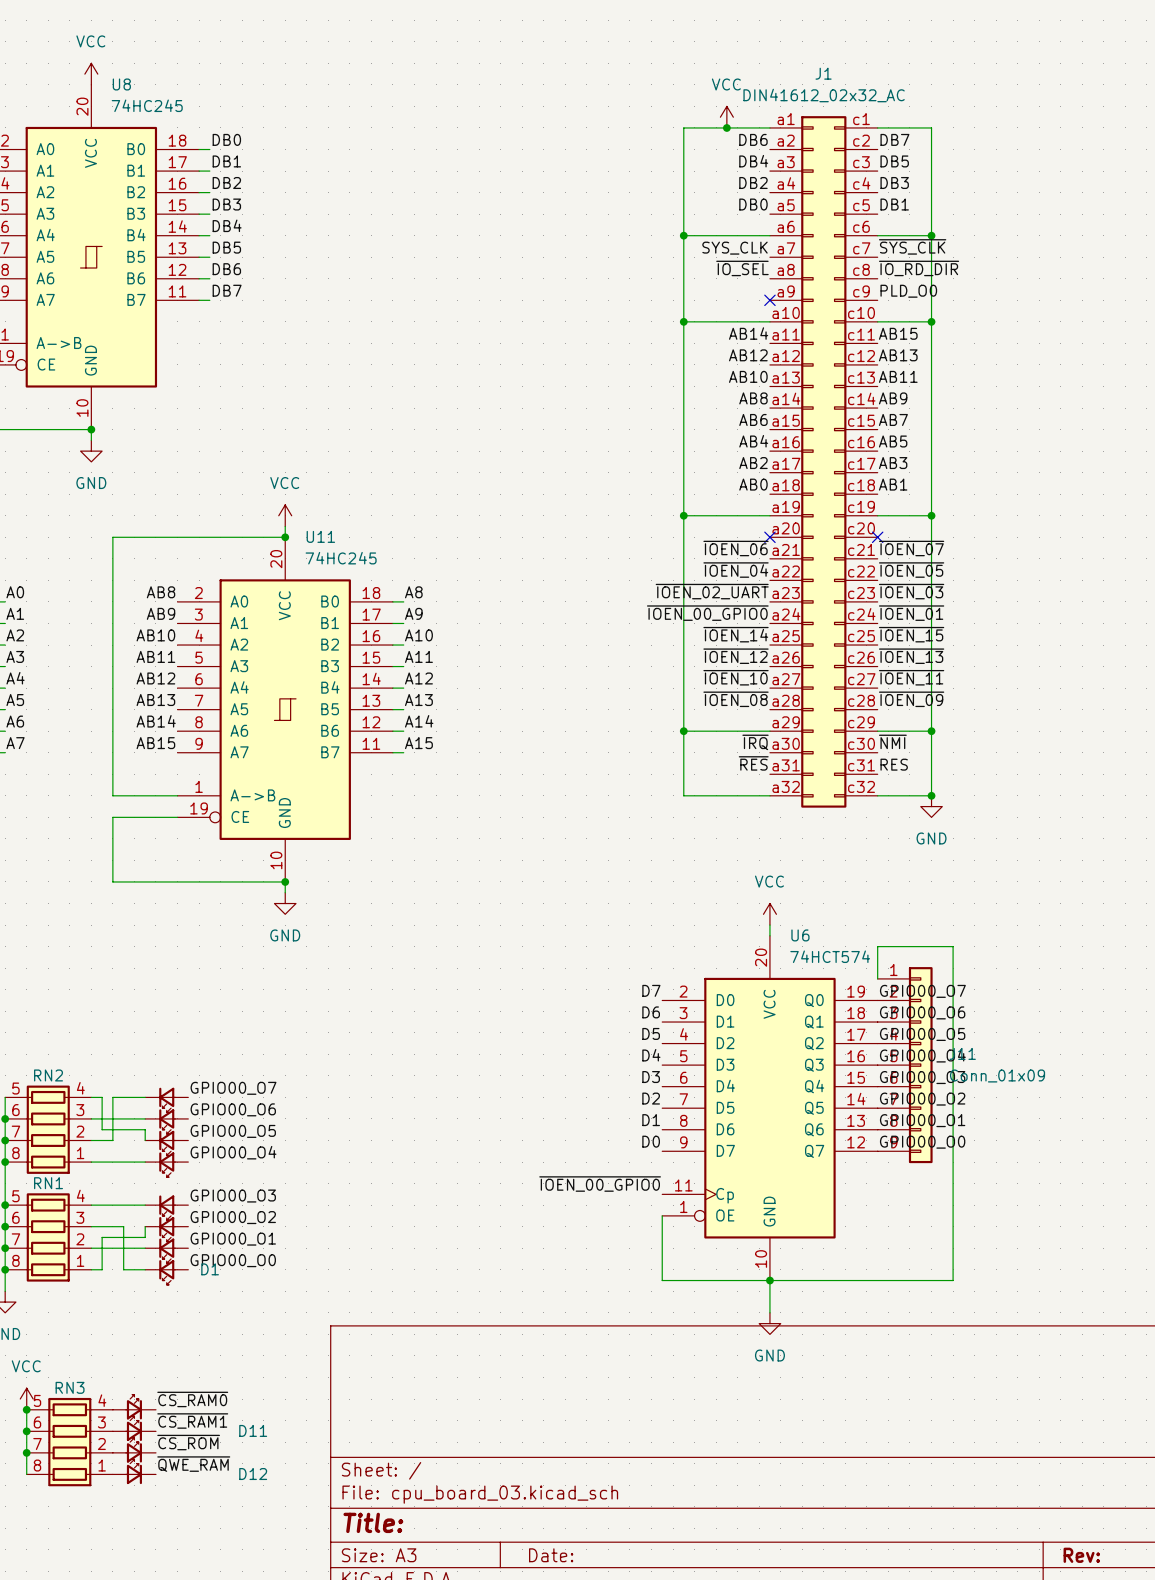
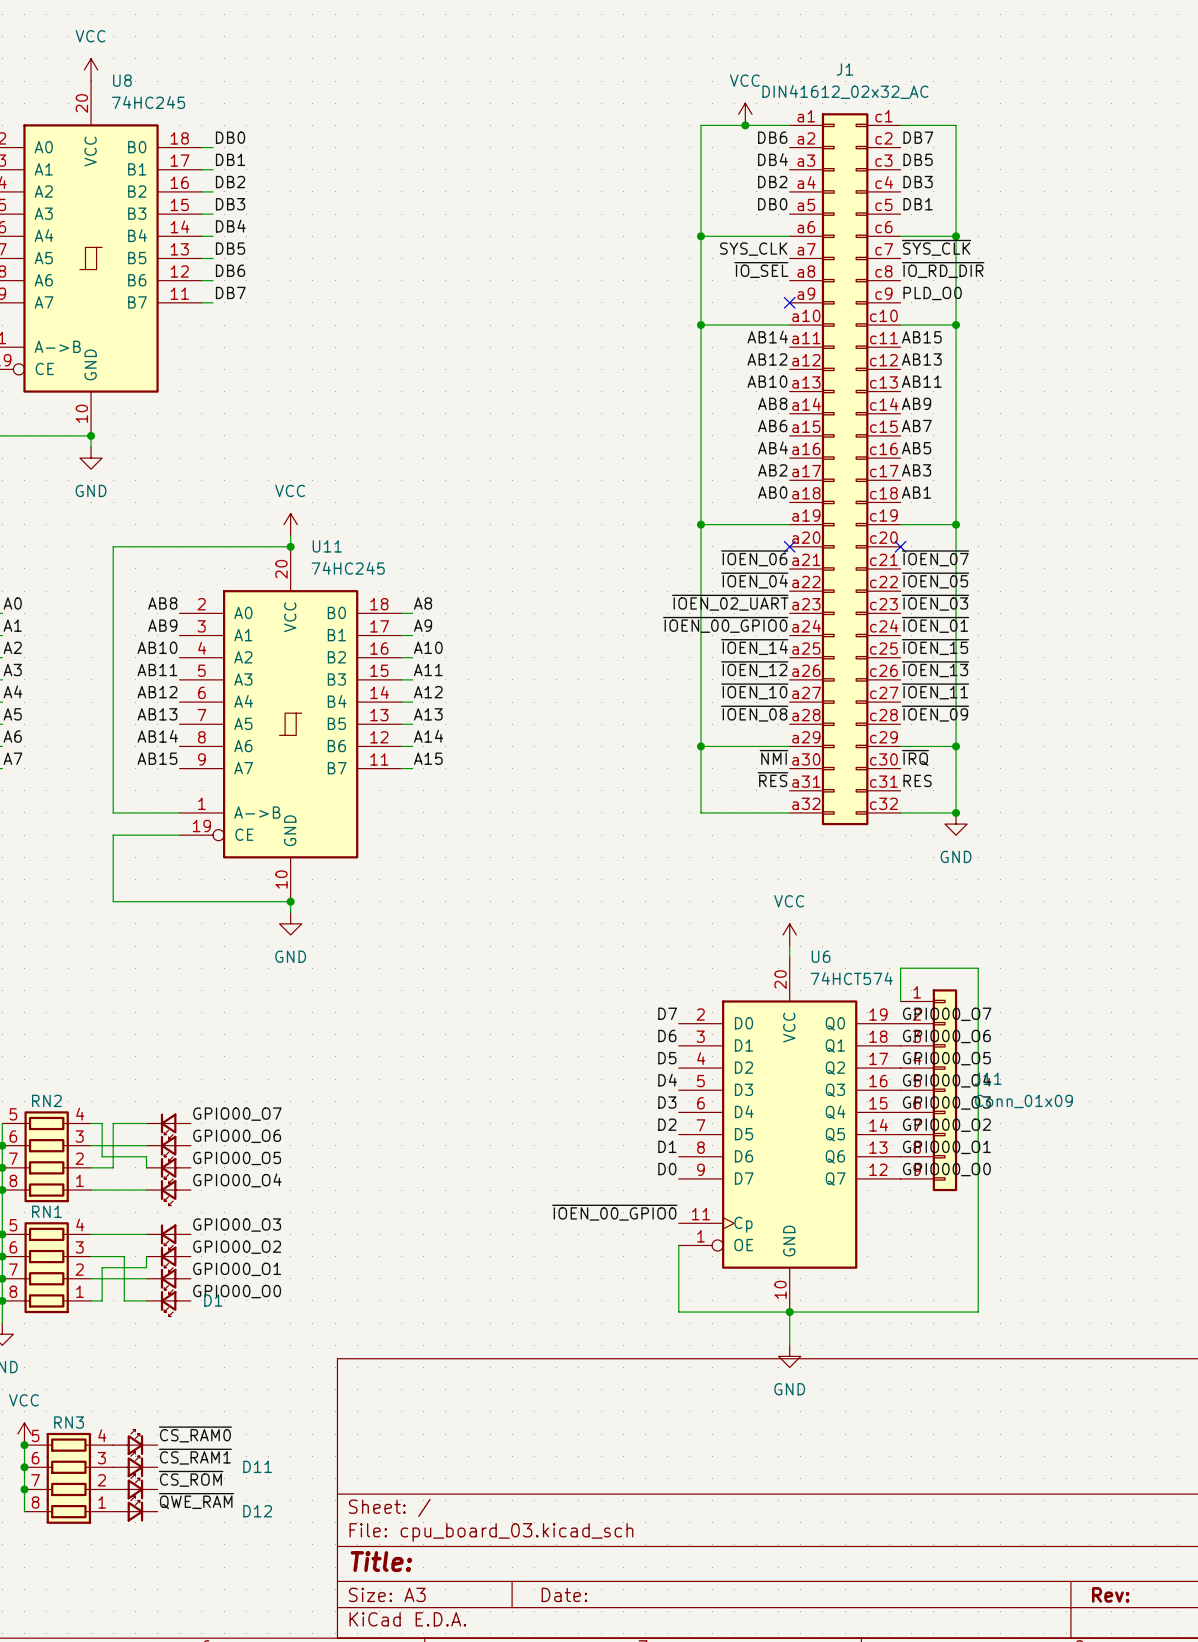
label: ~{NMI} (892, 741) -> ~{IRQ} (915, 757)
label: ~{IRQ} (755, 742) -> ~{NMI} (774, 757)

